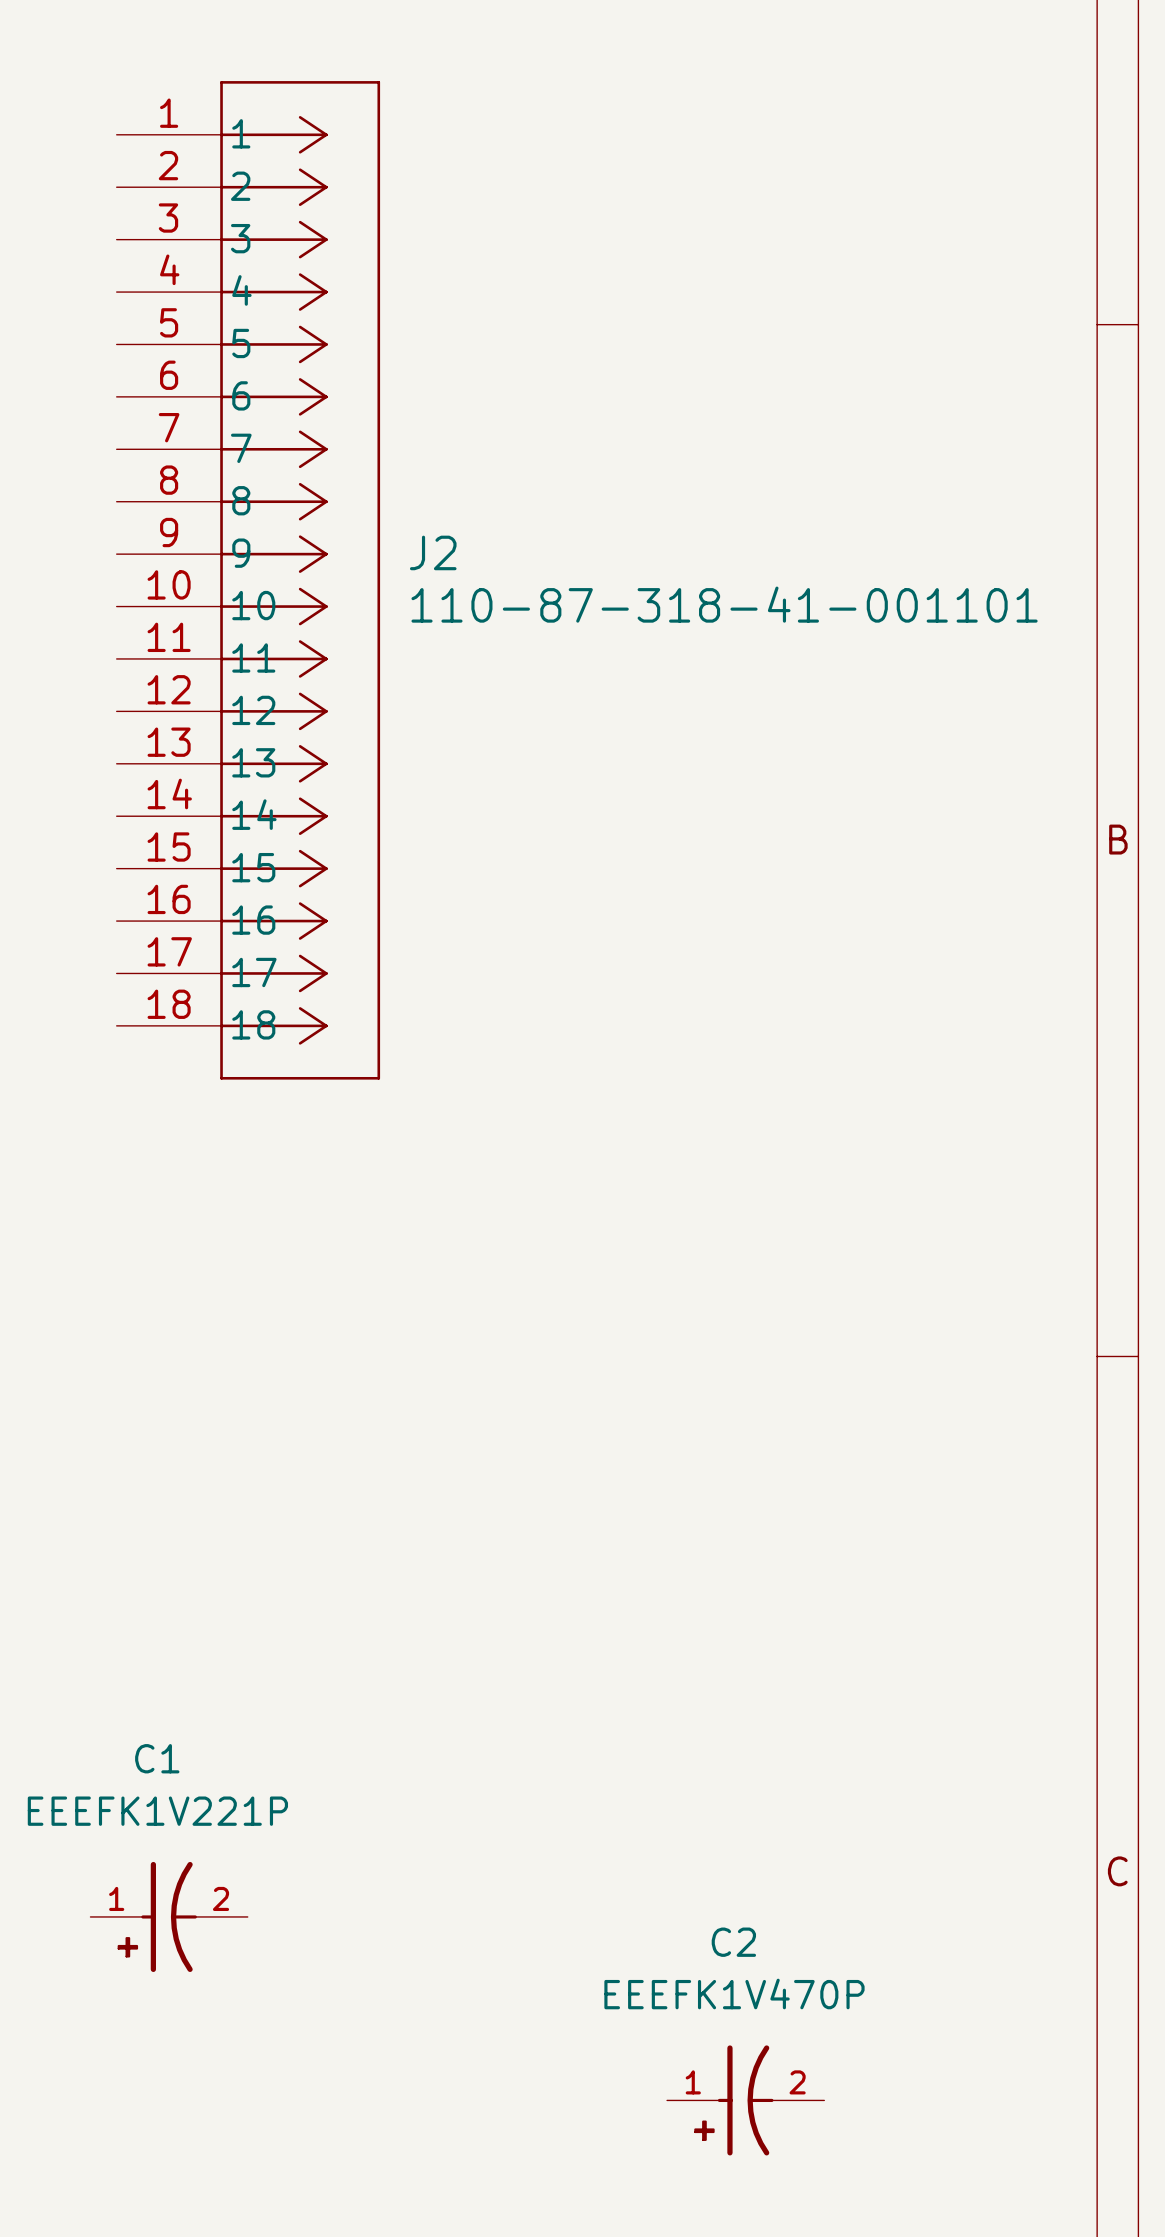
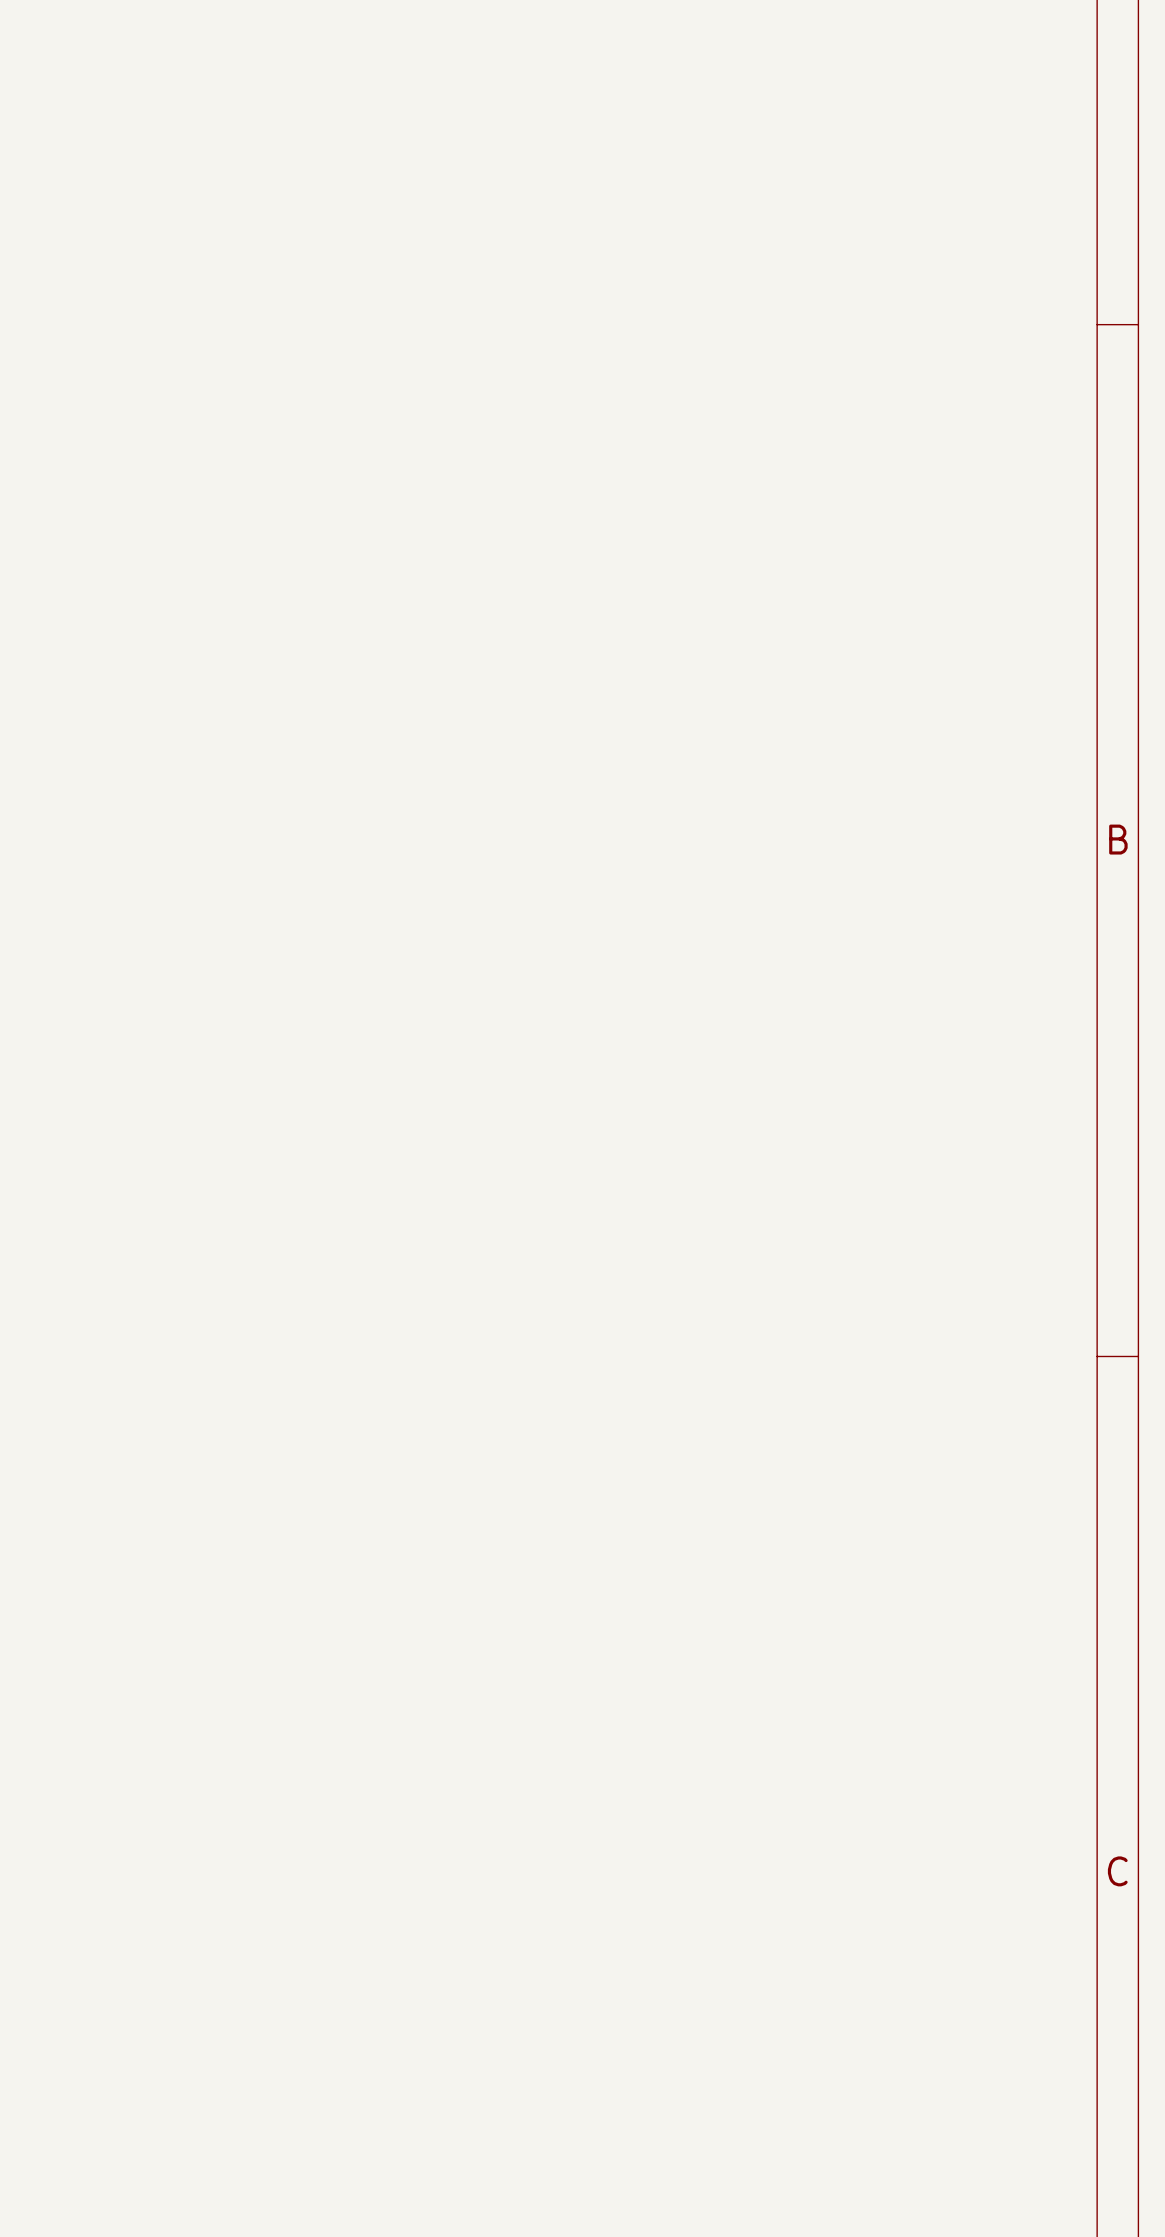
J2: 110-87-318-41-001101 (248, 580) -> none
C1: EEEFK1V221P (169, 1916) -> none
C2: EEEFK1V470P (745, 2100) -> none

